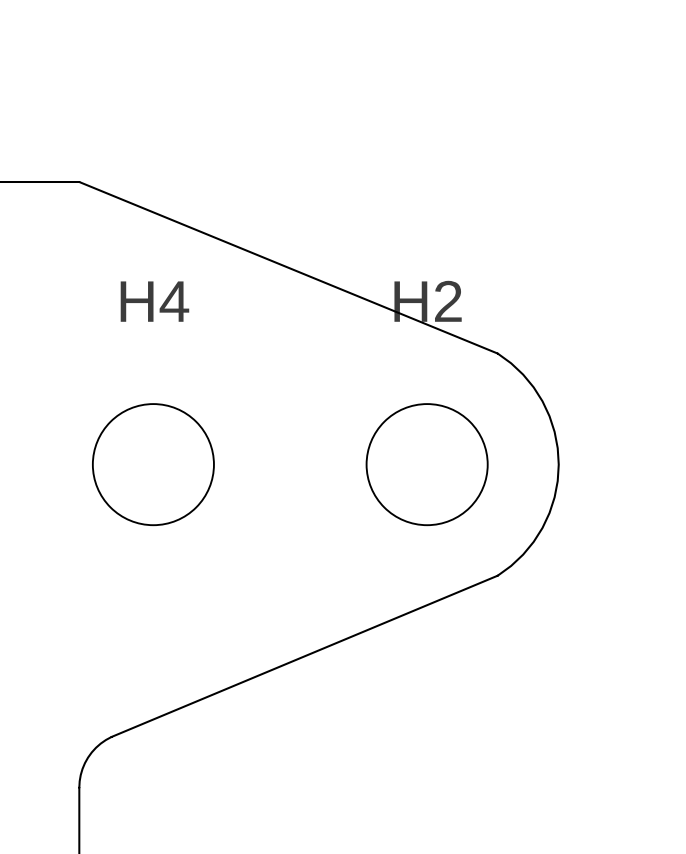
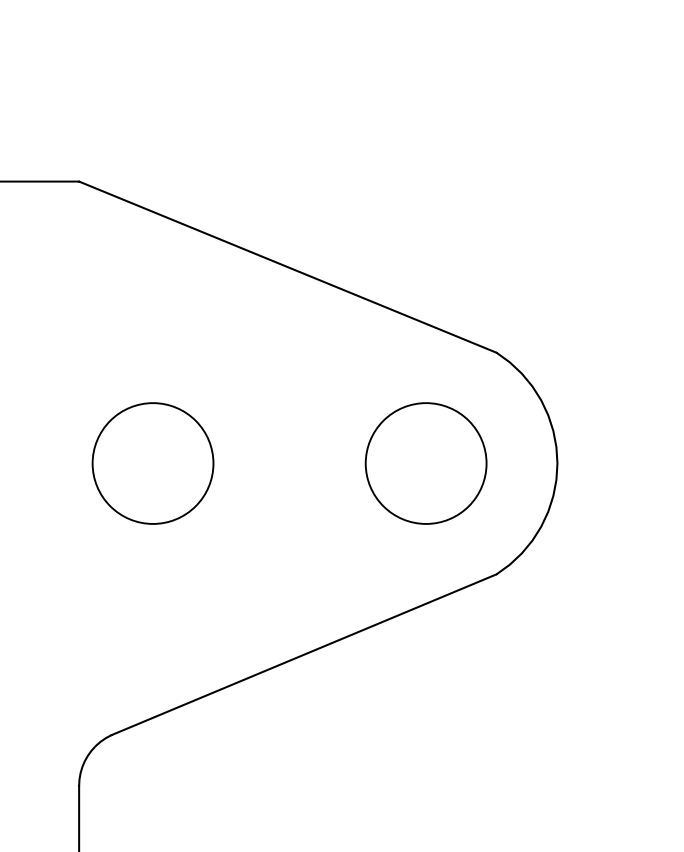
H4 name: H4 (154, 301) -> none
H2 name: H2 (428, 301) -> none

